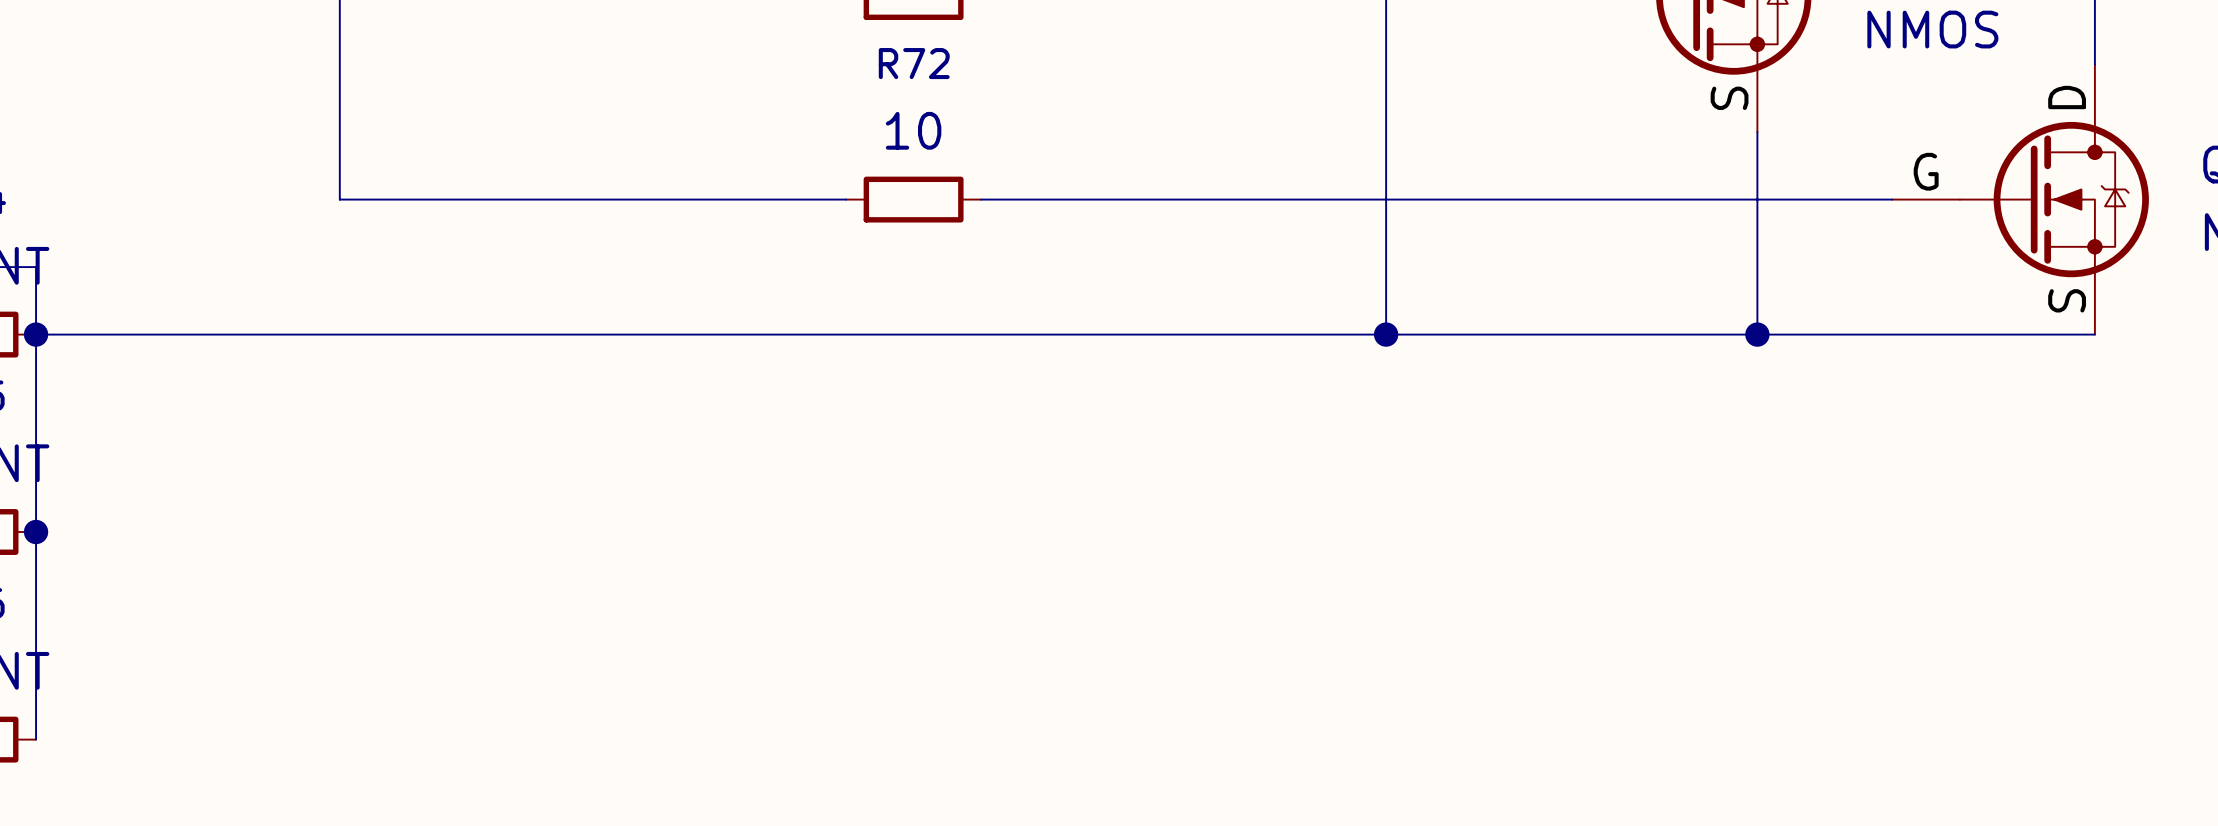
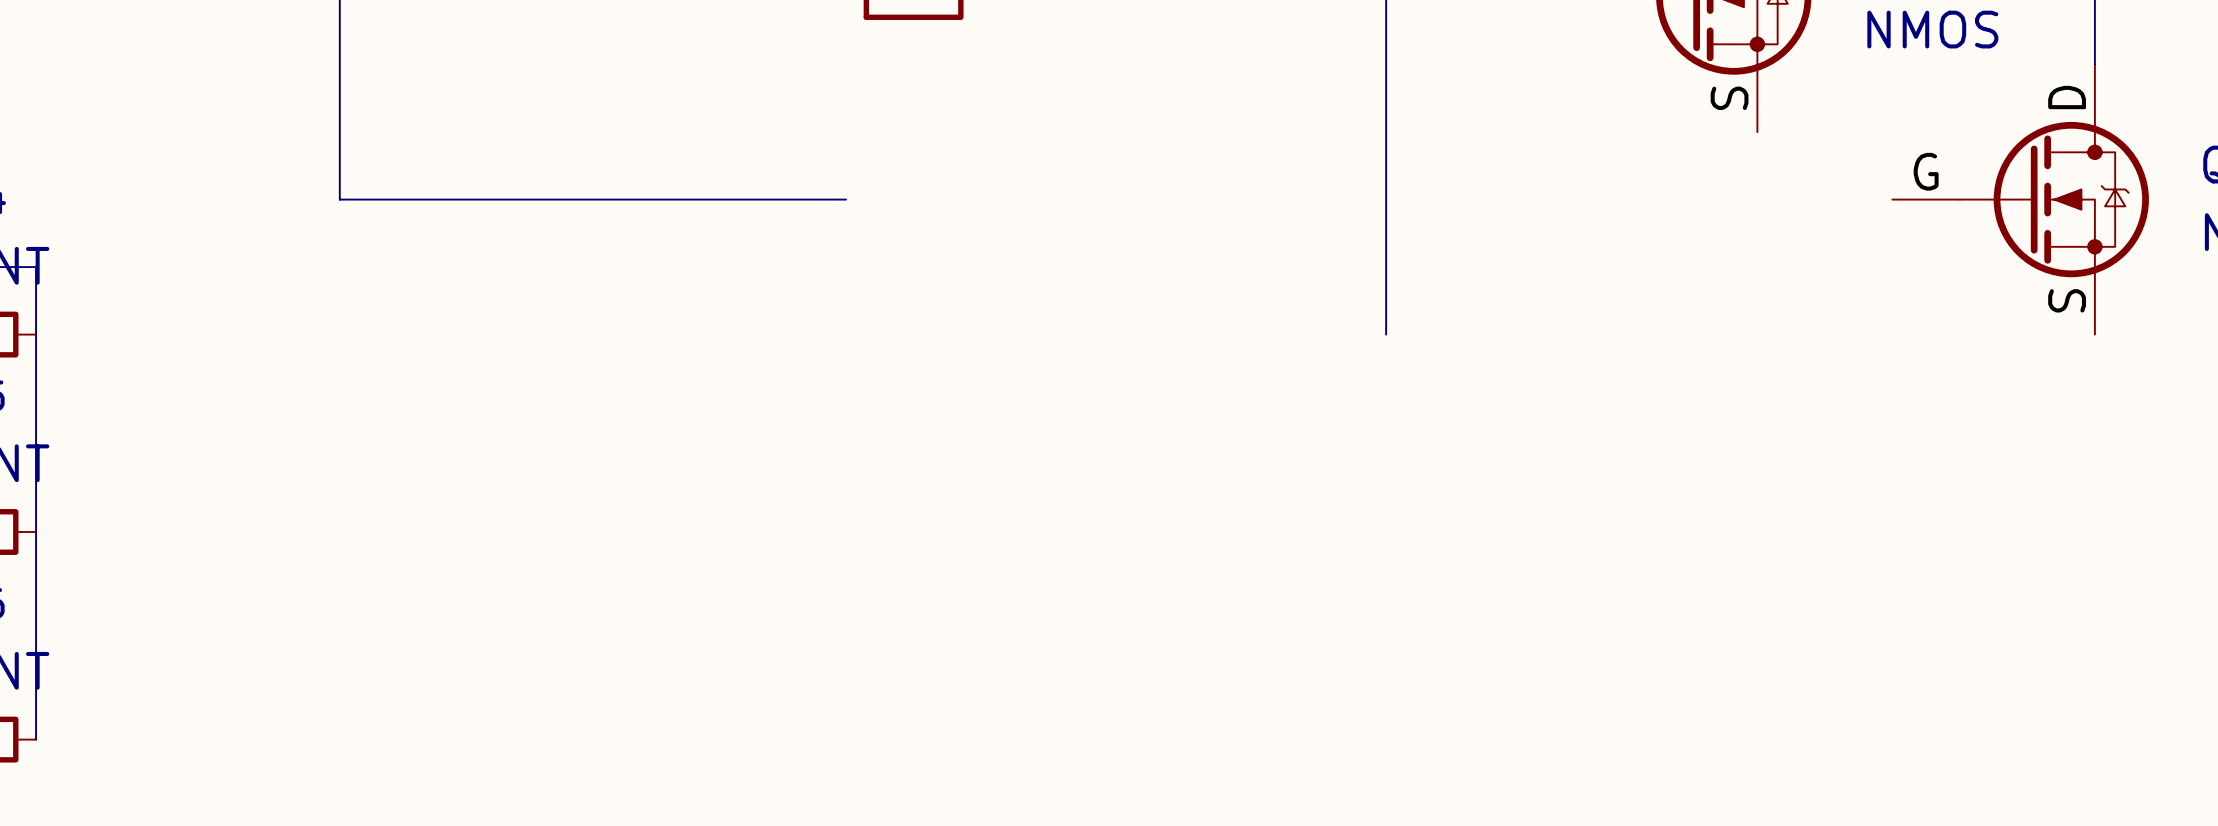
wire: (1757, 132) (1757, 334) -> none
R72: 10 (913, 199) -> none
wire: (981, 199) (1892, 199) -> none
wire: (36, 334) (2094, 334) -> none
junction: (36, 334) -> none
junction: (1386, 334) -> none
junction: (1757, 334) -> none
junction: (36, 532) -> none

